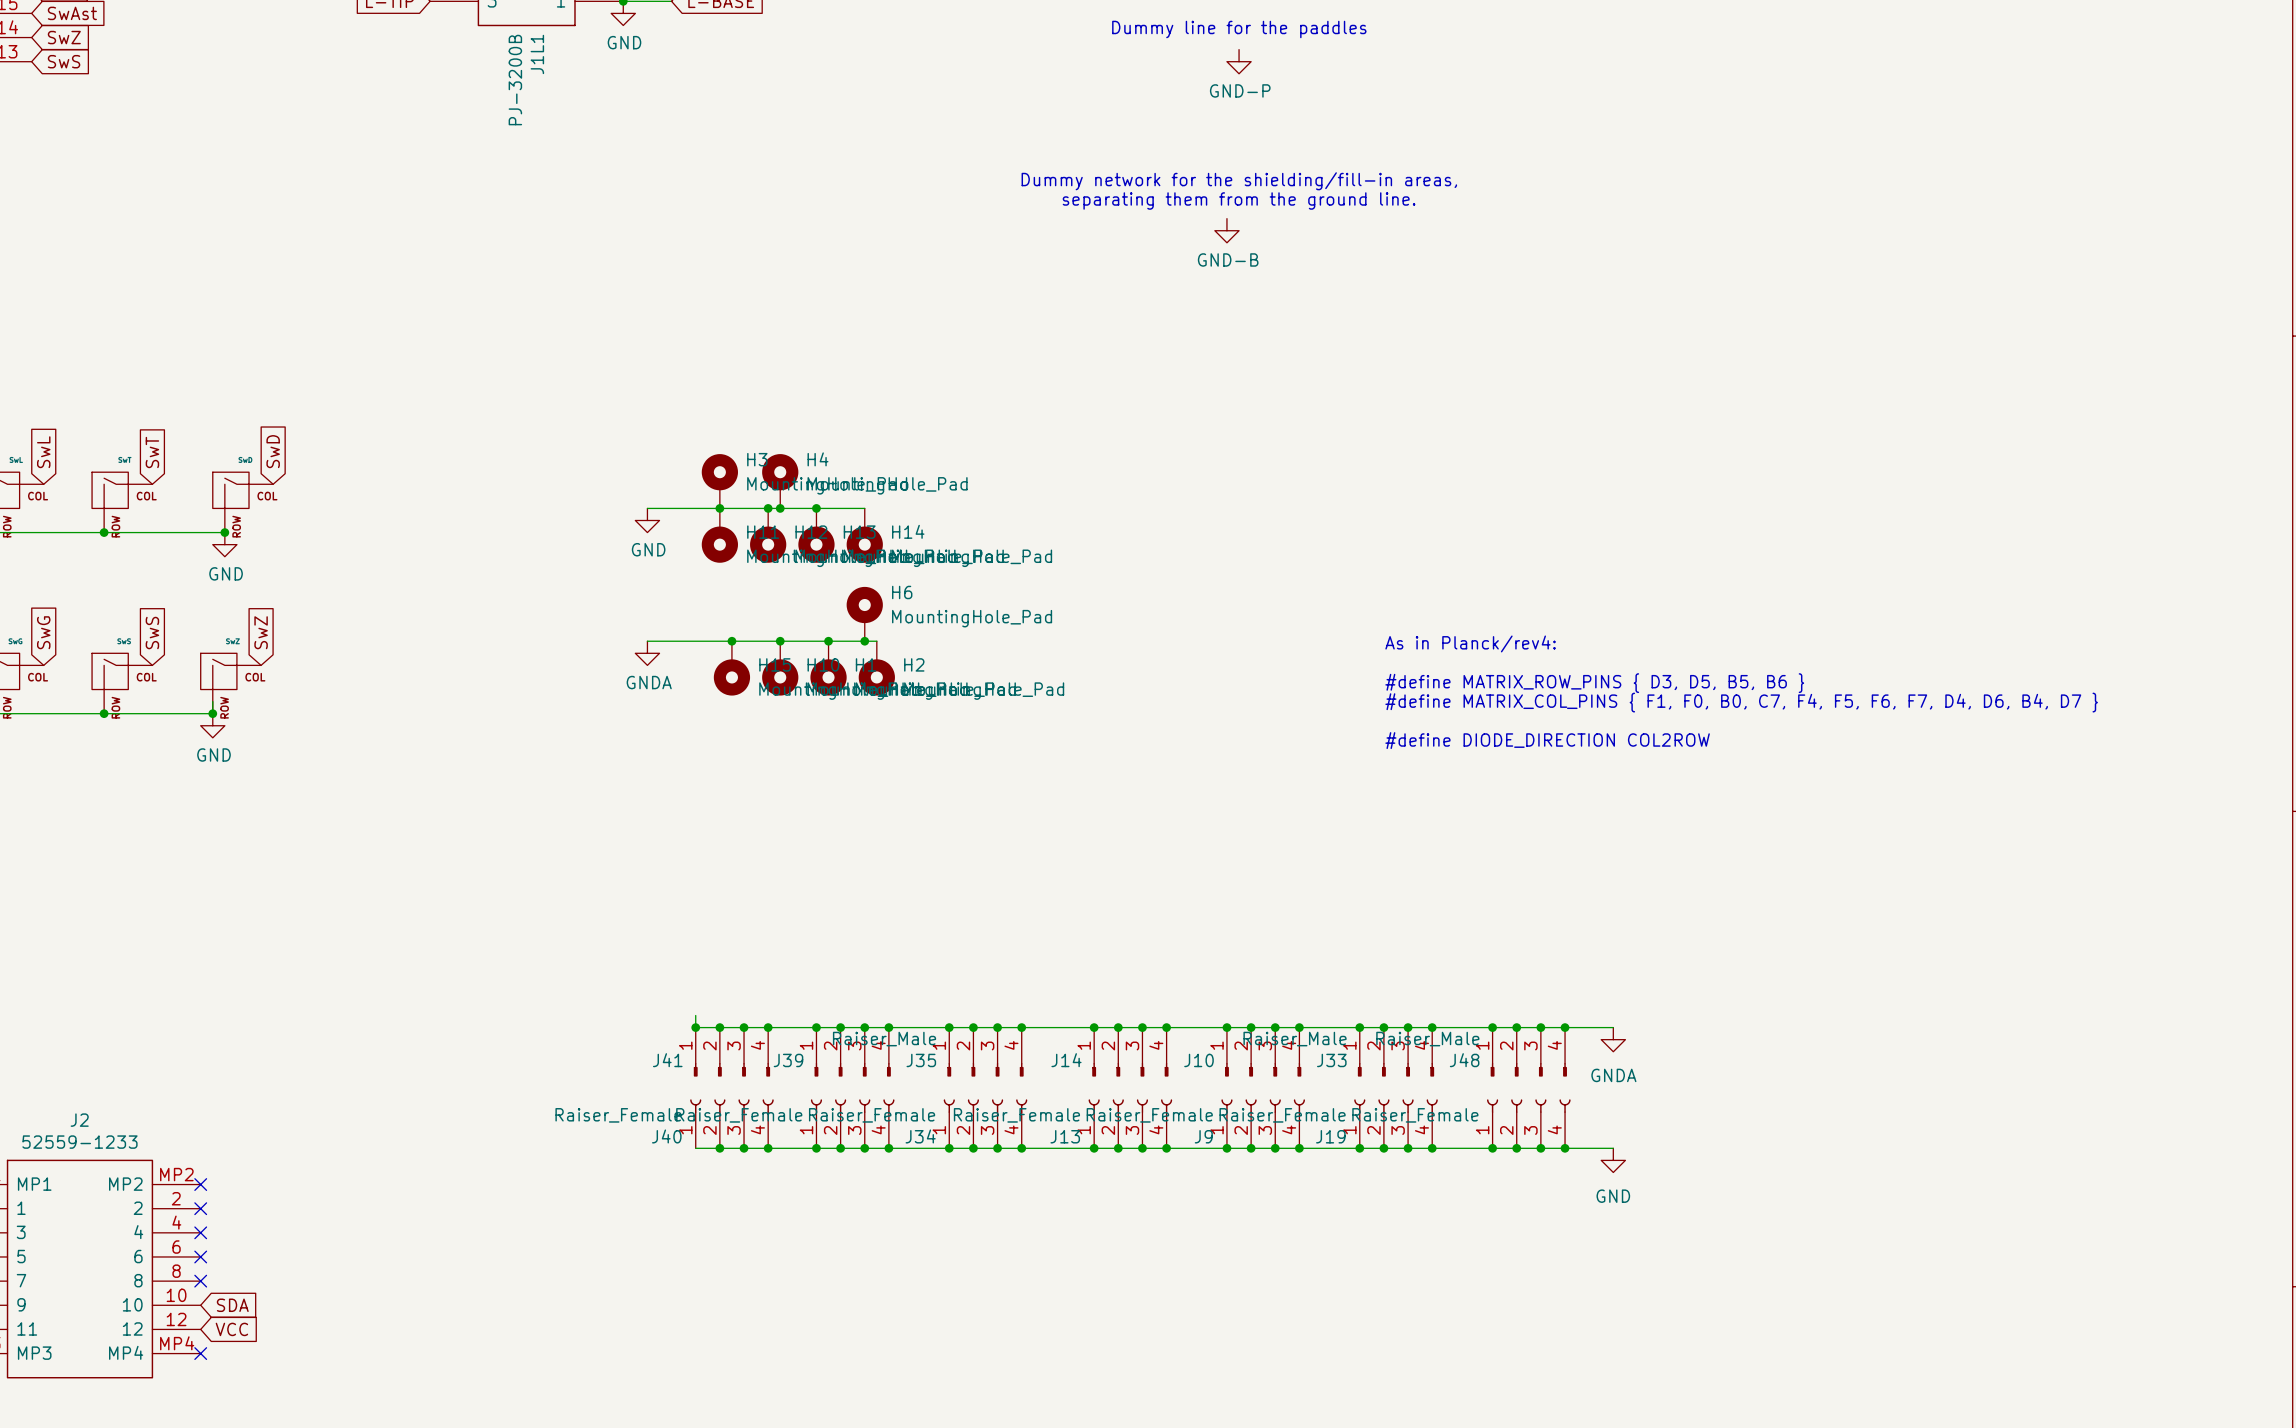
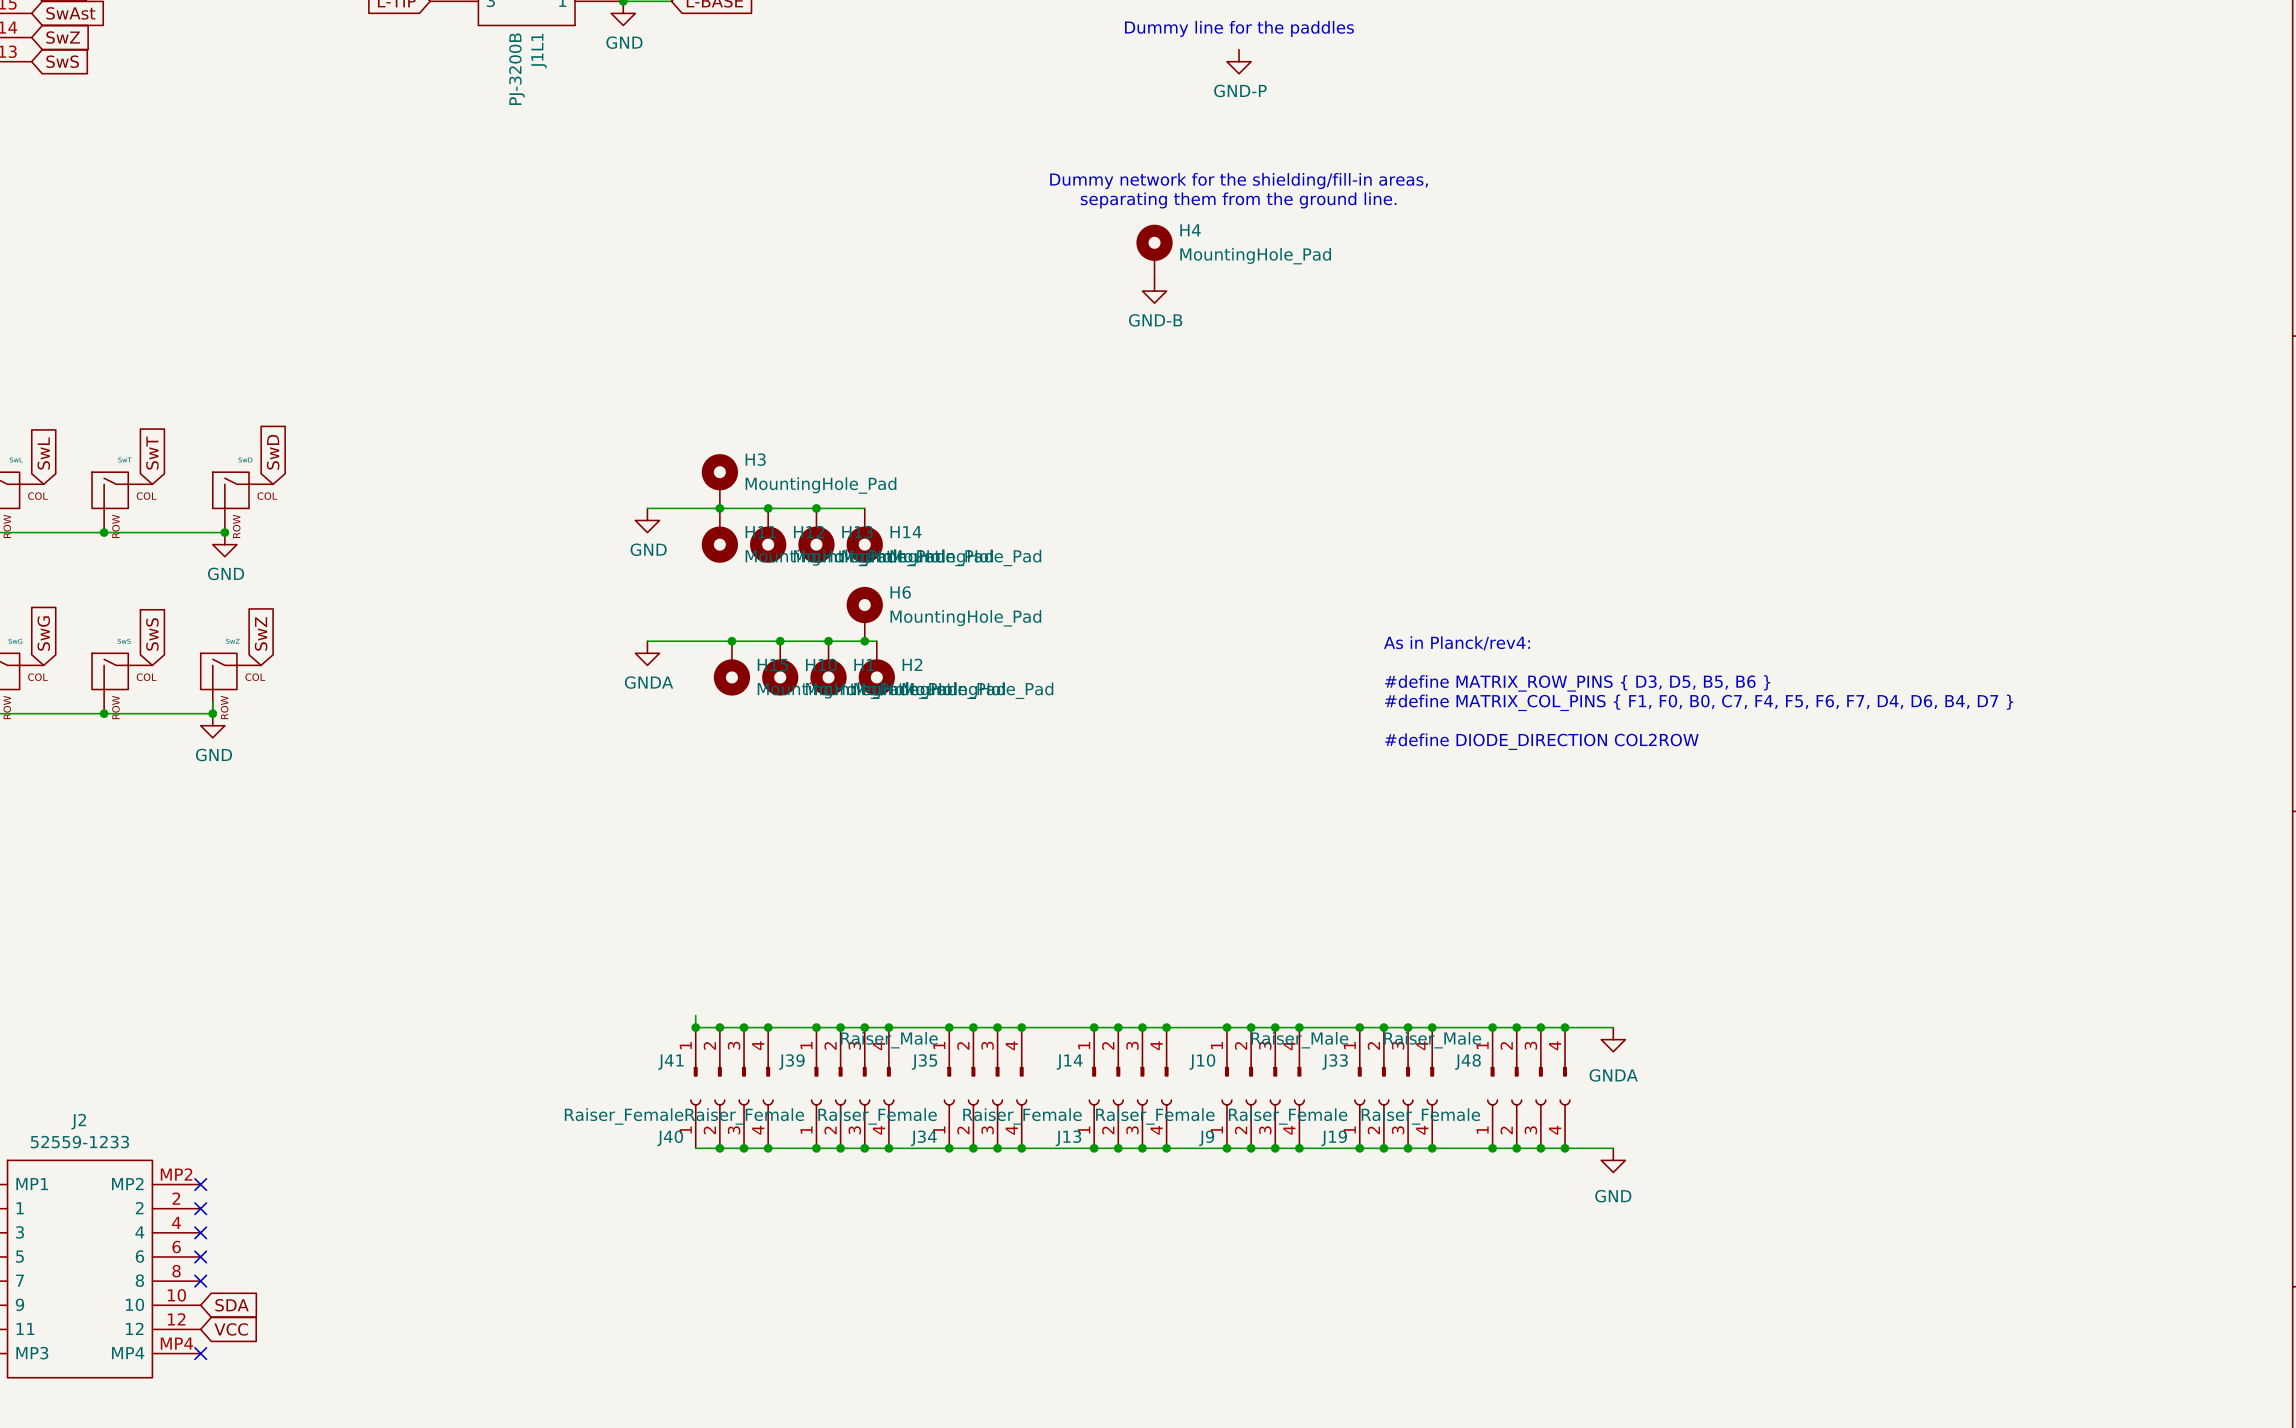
power symbol position: GND-B (1226, 230) -> GND-B (1154, 291)
H4 position: (780, 481) -> (1154, 251)
junction: (780, 508) -> none

